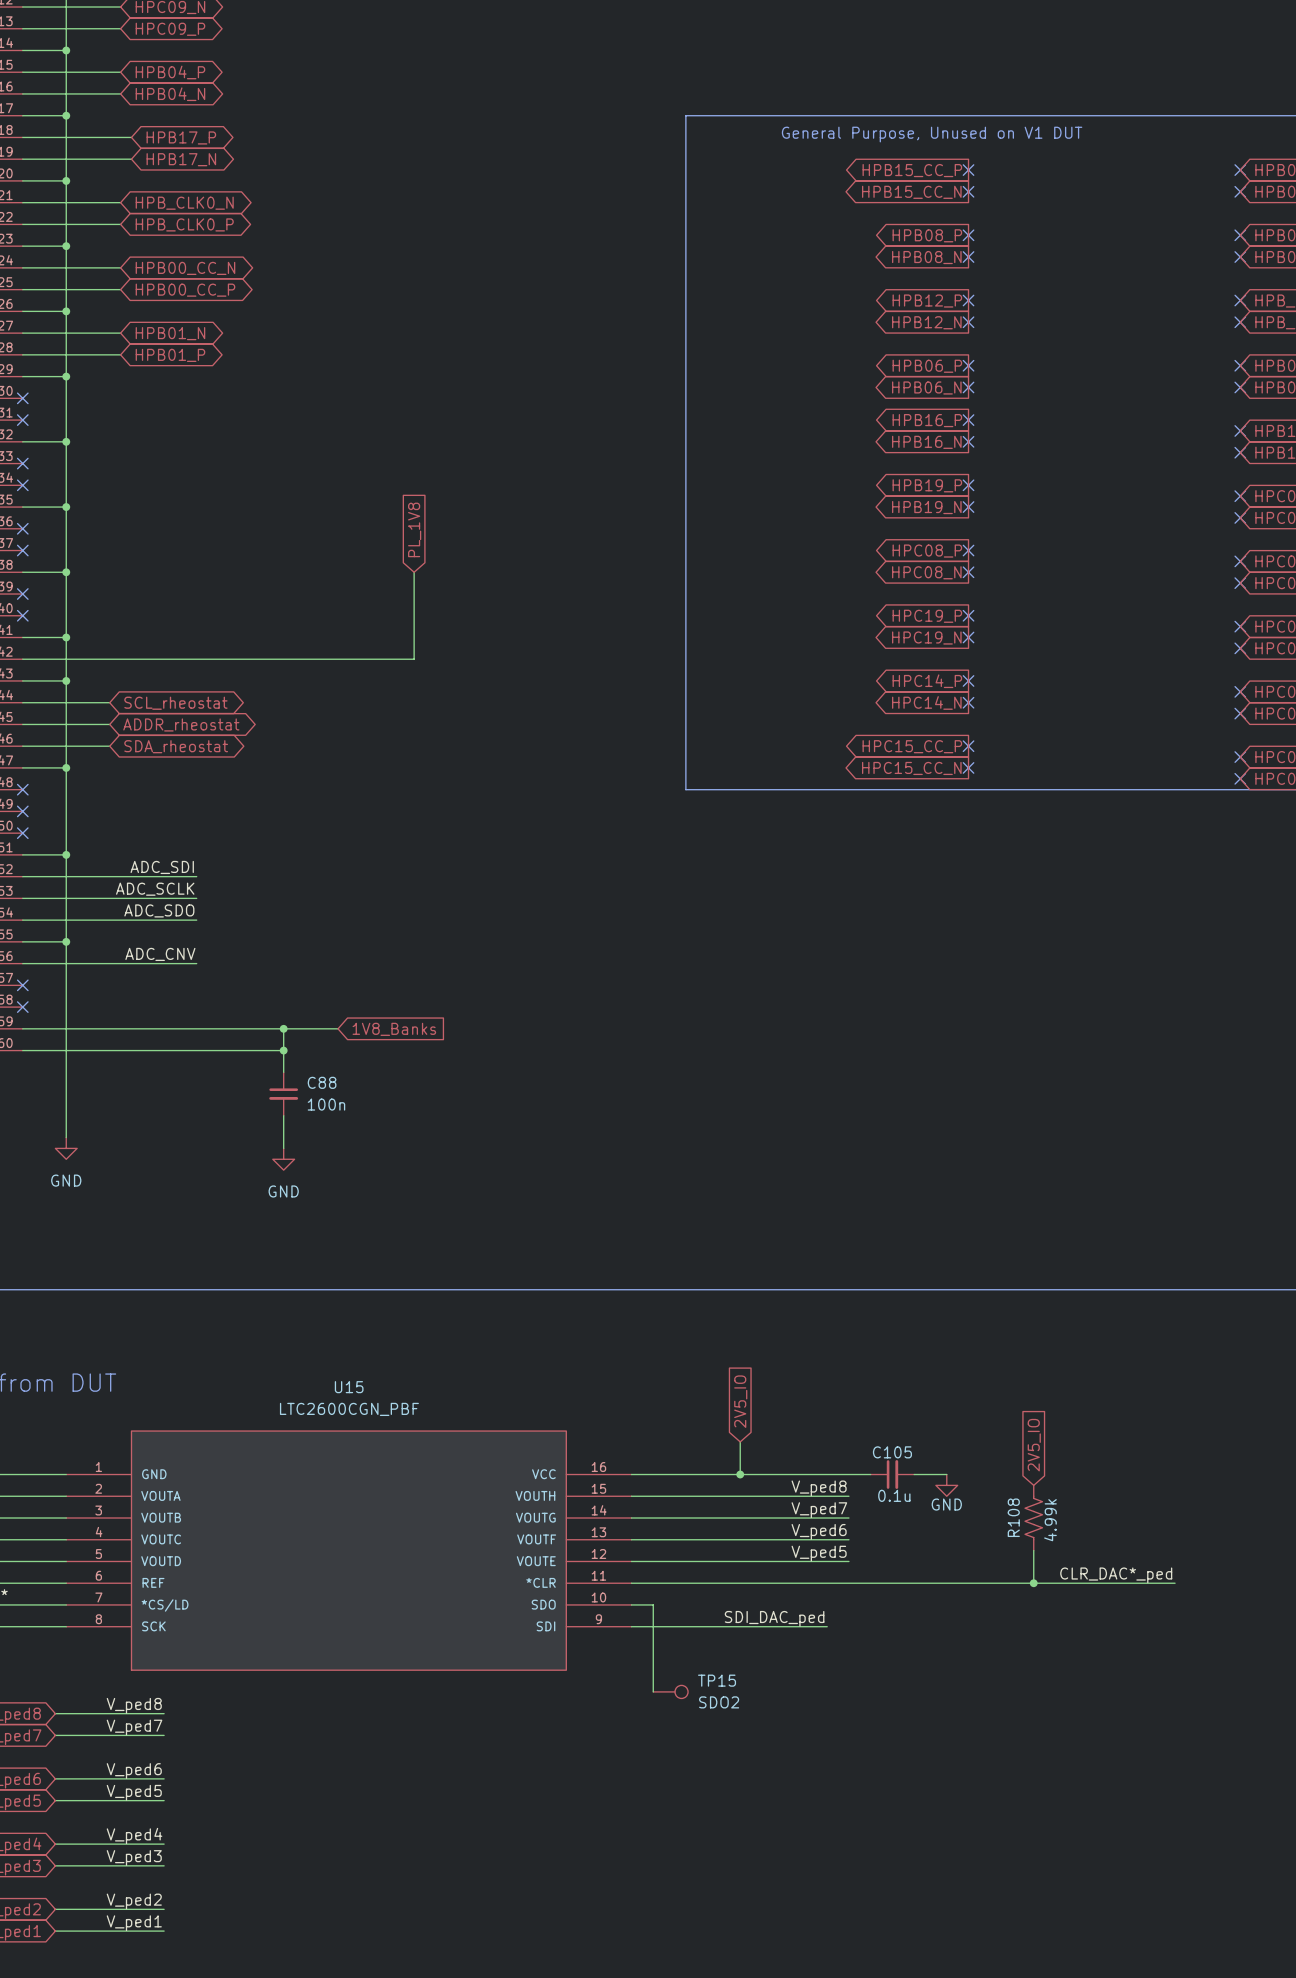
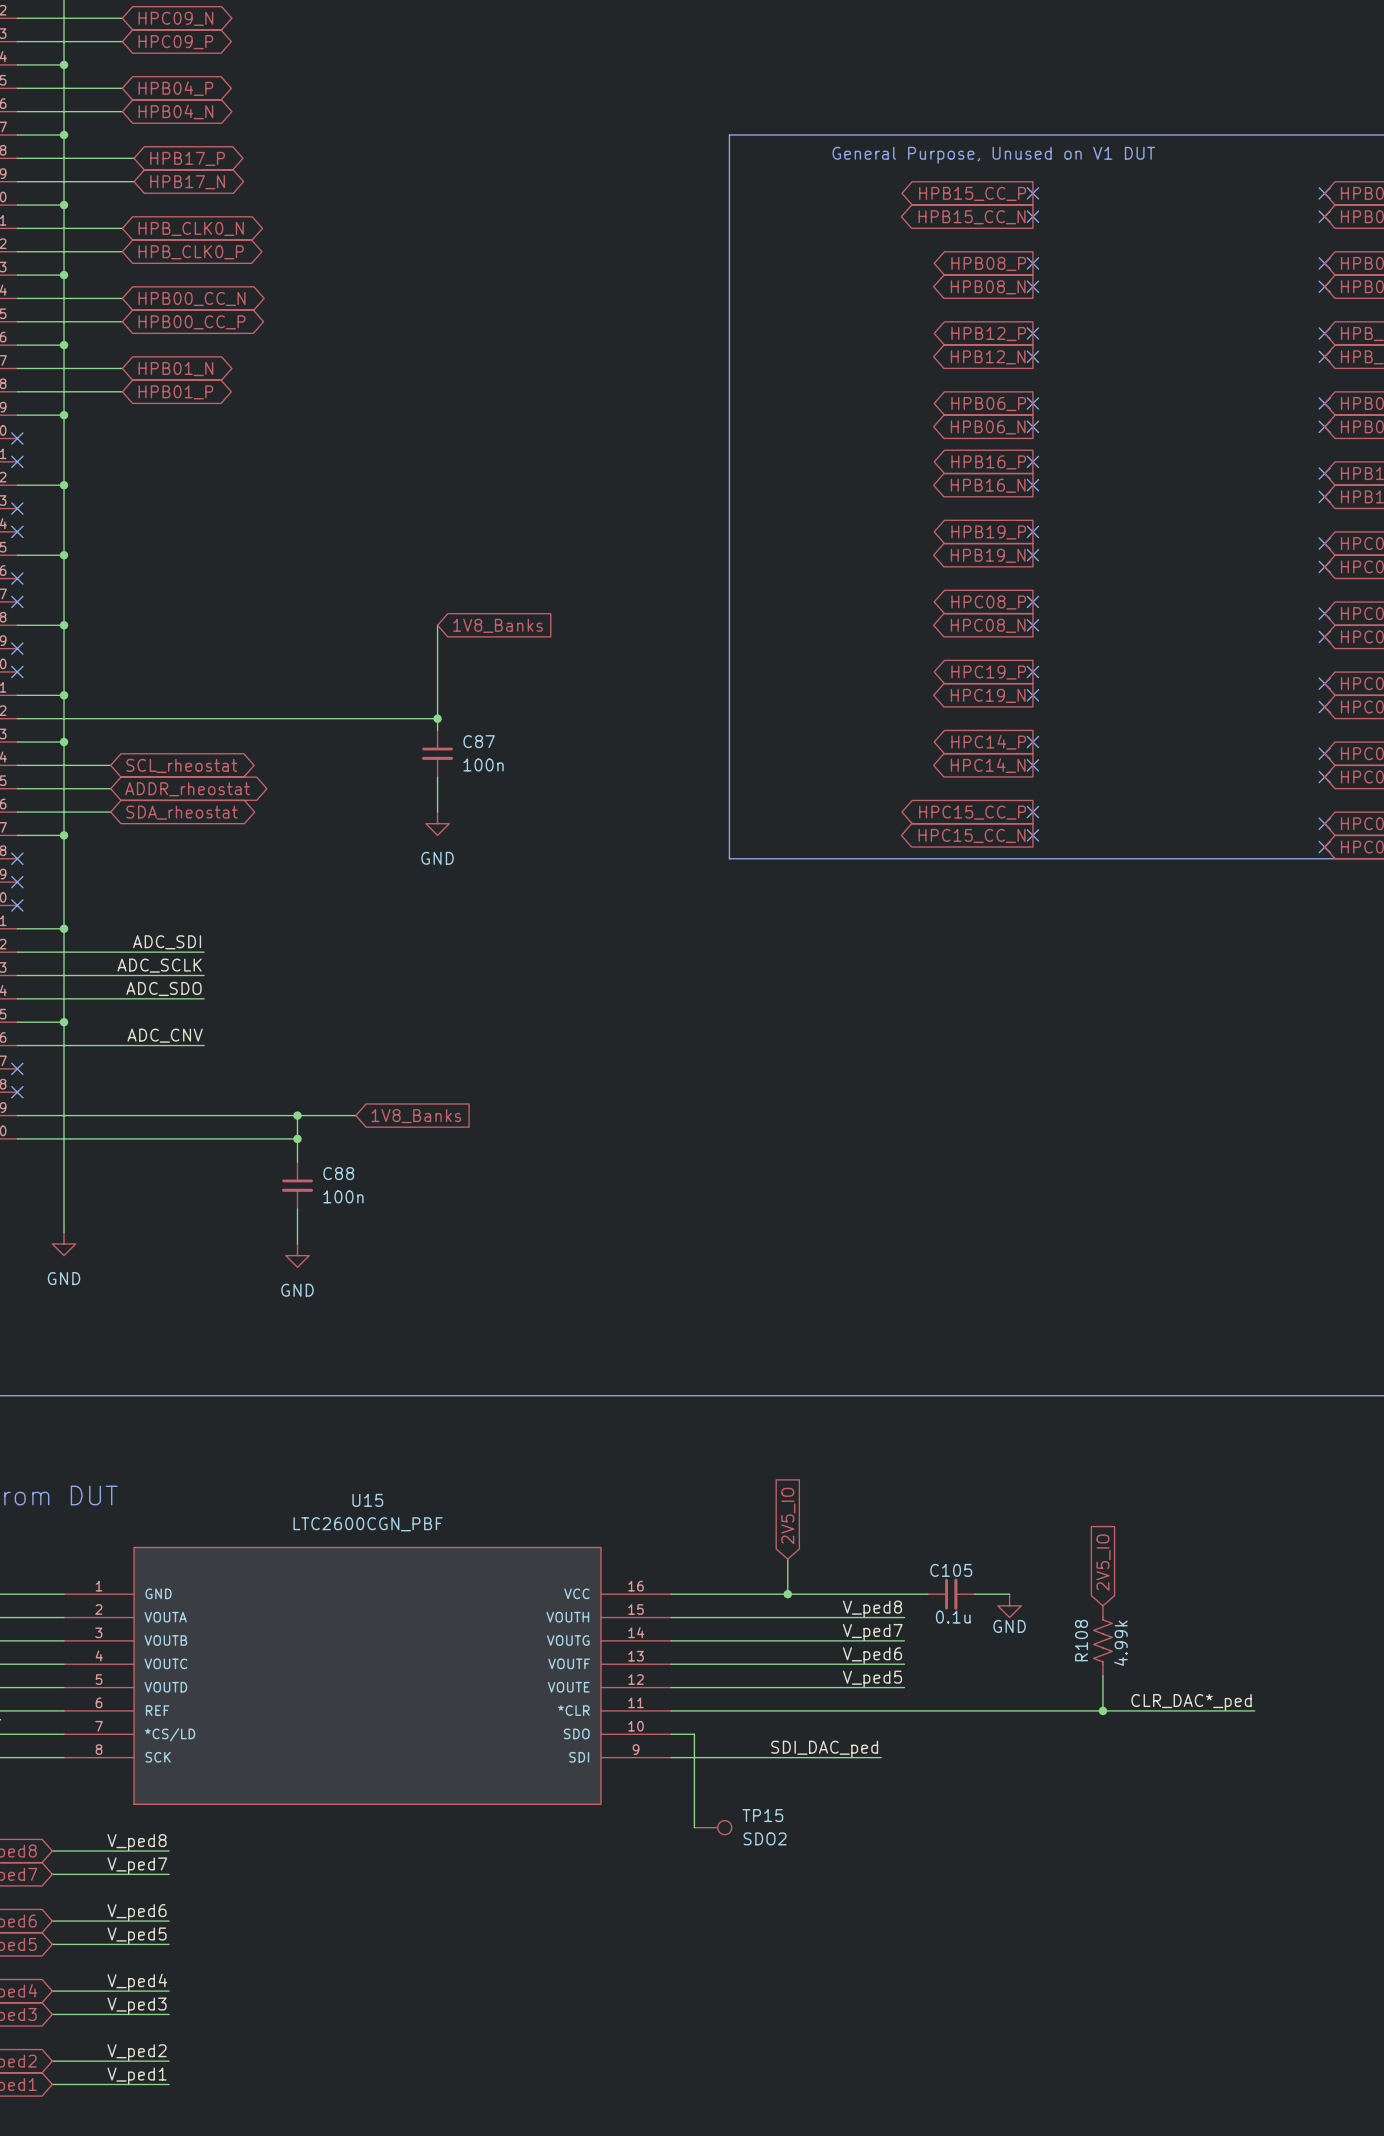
global label: PL_1V8 (414, 529) -> 1V8_Banks (498, 625)
wire: none -> (437, 718) (437, 730)
junction: none -> (437, 718)
C87: none -> 100n (437, 753)
wire: none -> (437, 777) (437, 812)
power symbol: none -> GND (437, 823)

